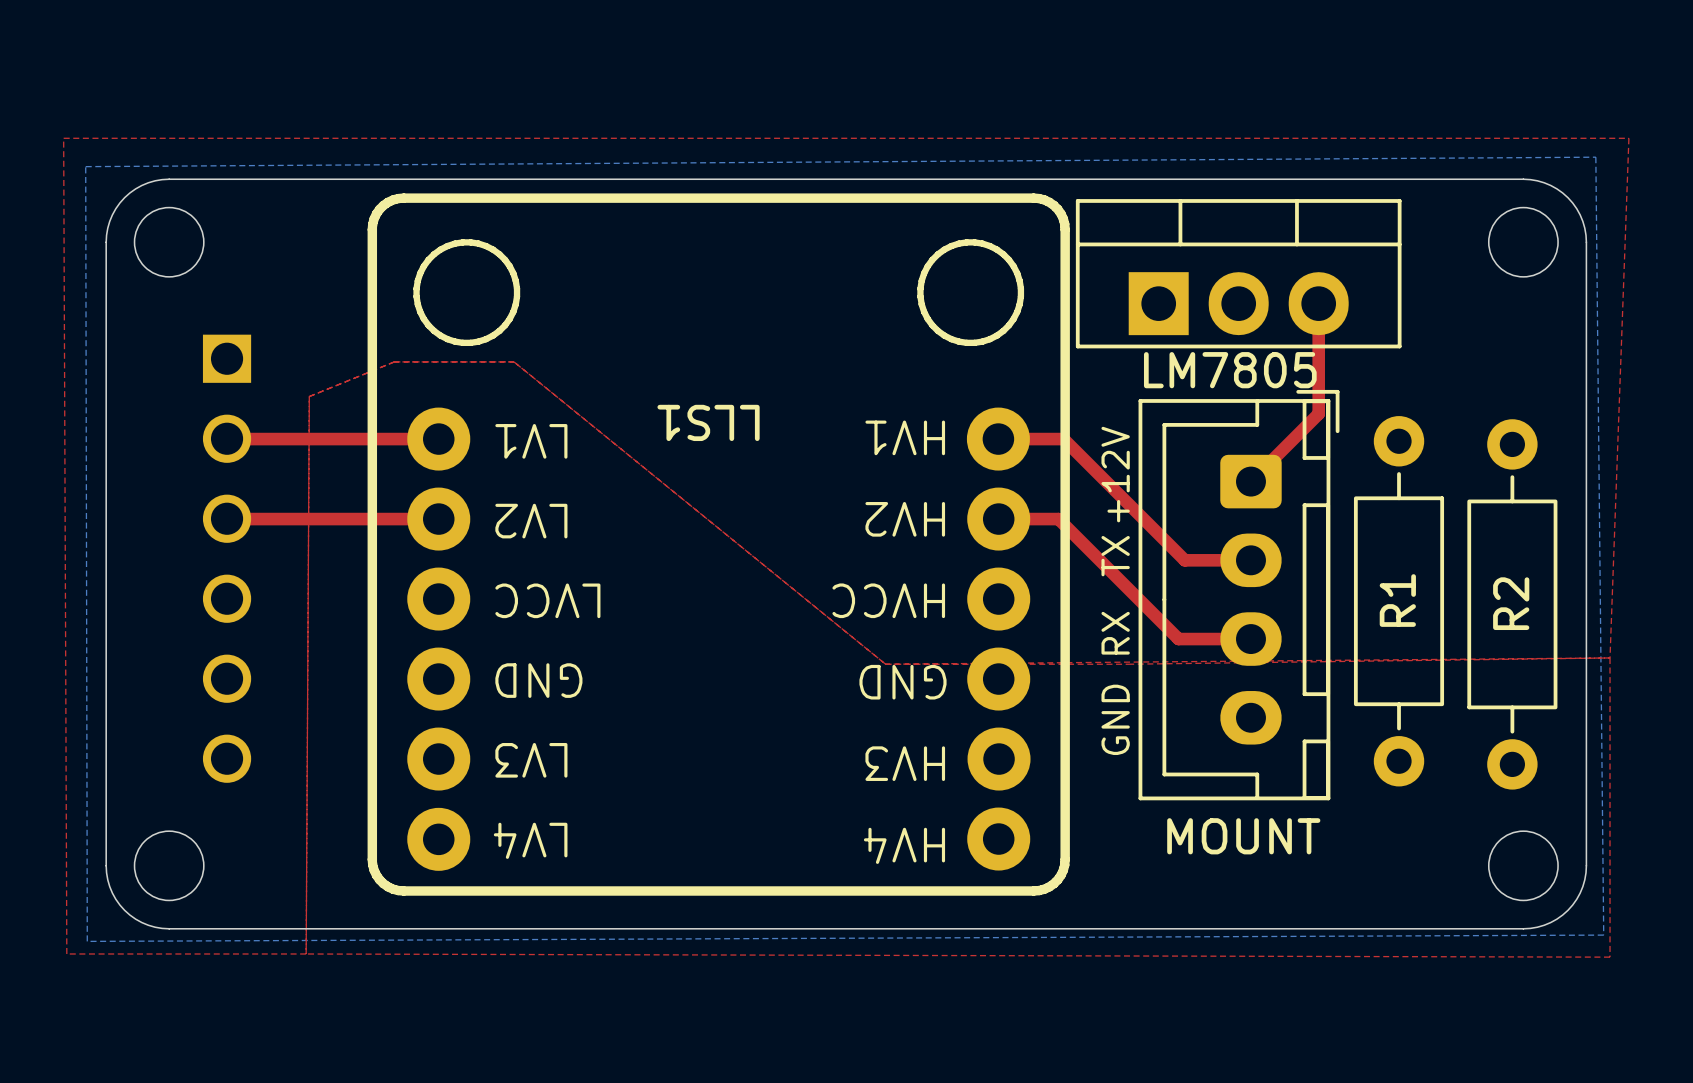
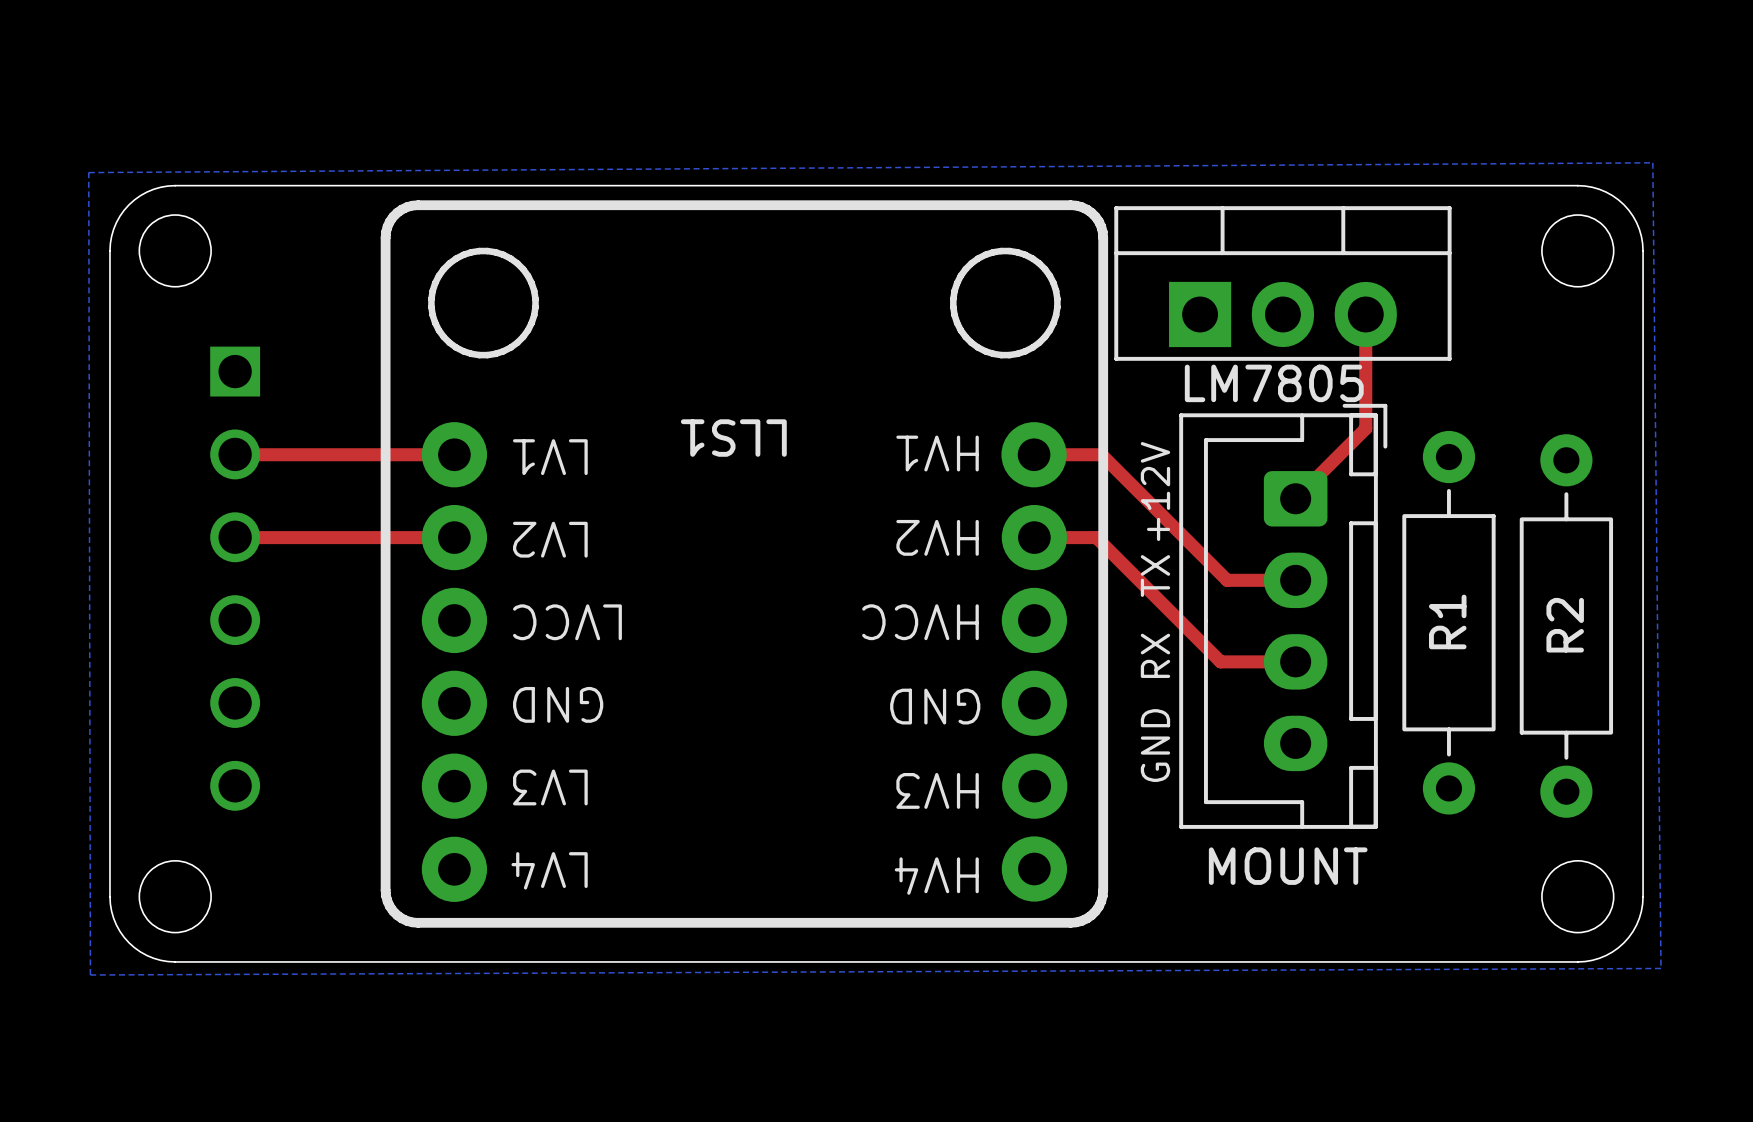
top zone outline: (1610, 657) (1628, 138) (63, 138) (66, 953) (306, 953) -> none
top zone outline: (1610, 657) (885, 664) -> none
top zone outline: (1610, 657) (1128, 664) (885, 664) -> none
top zone outline: (1610, 657) (1610, 957) (306, 953) -> none
top zone outline: (885, 664) (514, 361) (394, 361) (309, 396) (306, 953) -> none

